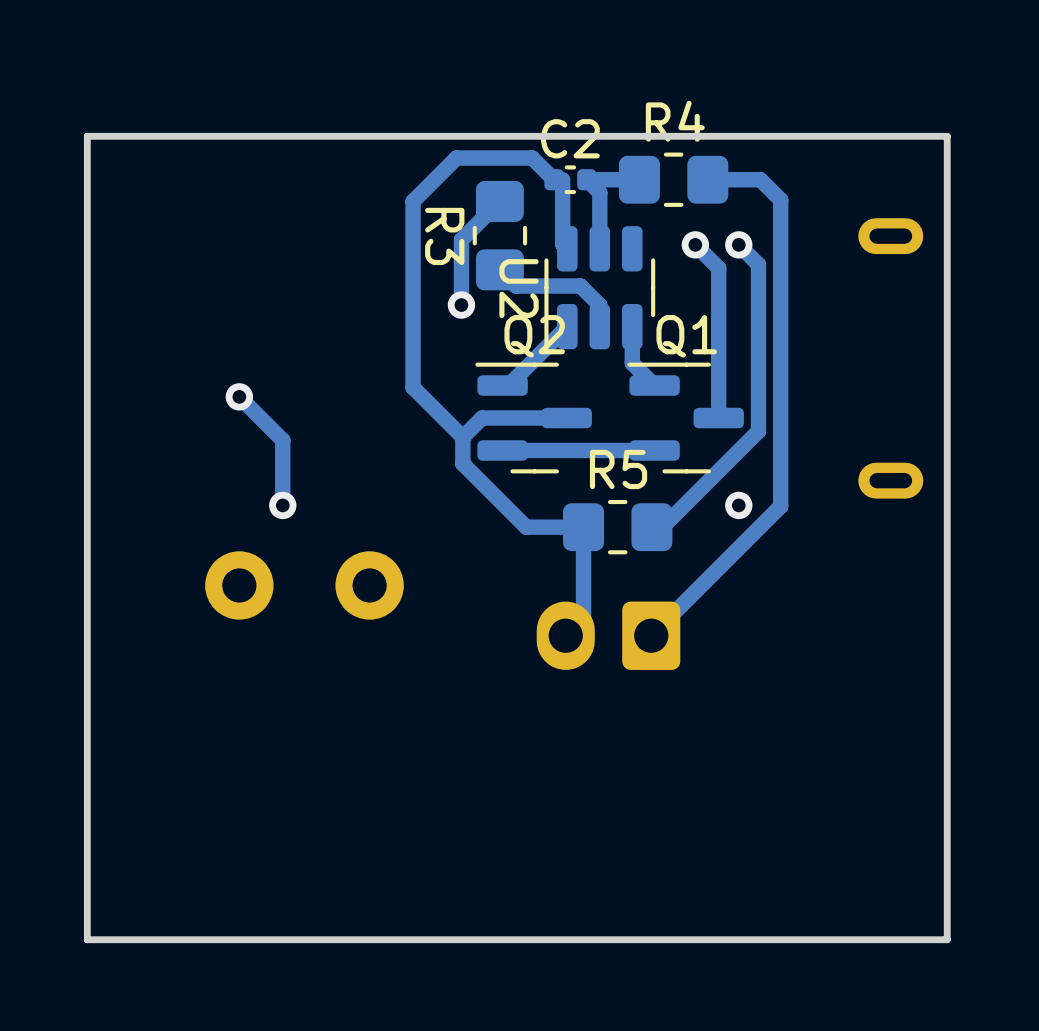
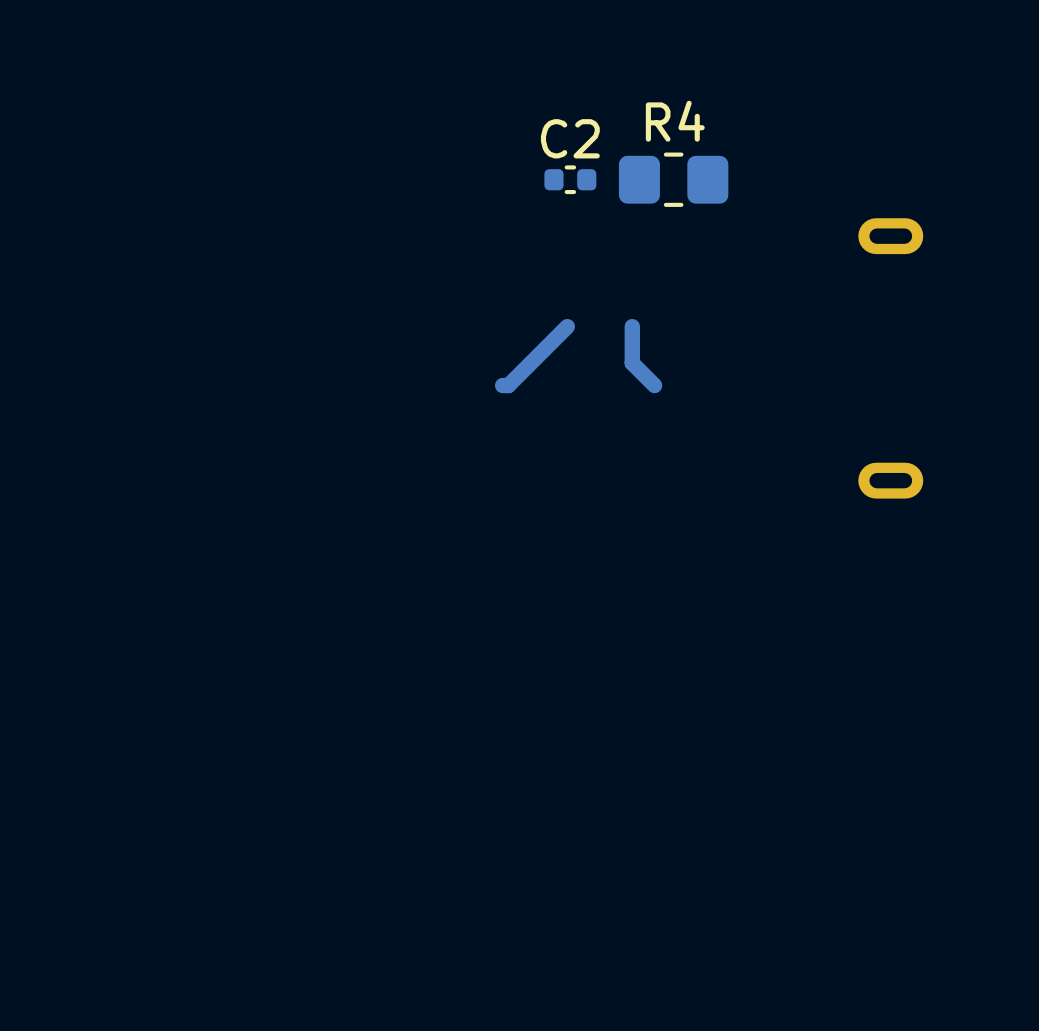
board edge: (947, 136) (87, 136) (87, 939) (947, 939) (947, 136) -> none
track: (553, 179) (532, 158) (456, 158) (413, 201) (413, 387) (462, 437) -> none
track: (562, 179) (562, 244) (567, 248) -> none
track: (639, 179) (586, 179) (599, 192) (599, 248) -> none
track: (707, 179) (760, 179) (780, 199) (780, 506) (651, 635) -> none
track: (499, 201) (461, 239) (461, 305) -> none
R3: (499, 235) -> none
track: (695, 244) (718, 268) (718, 418) -> none
via: (695, 244) -> none
track: (738, 244) (758, 264) (758, 431) (662, 527) (651, 527) -> none
via: (738, 244) -> none
track: (499, 269) (516, 286) (580, 286) (599, 305) (599, 326) -> none
U2: (599, 288) -> none
via: (461, 305) -> none
track: (239, 396) (282, 440) (282, 505) -> none
via: (239, 396) -> none
Q2: (533, 418) -> none
track: (566, 418) (482, 418) (462, 437) -> none
Q1: (685, 418) -> none
track: (462, 437) (462, 463) (526, 527) (583, 527) (583, 617) (565, 635) -> none
track: (654, 450) (502, 450) -> none
via: (282, 505) -> none
via: (738, 505) -> none
R5: (617, 527) -> none
part: (239, 585) -> none
part: (369, 585) -> none
part: (608, 635) -> none

